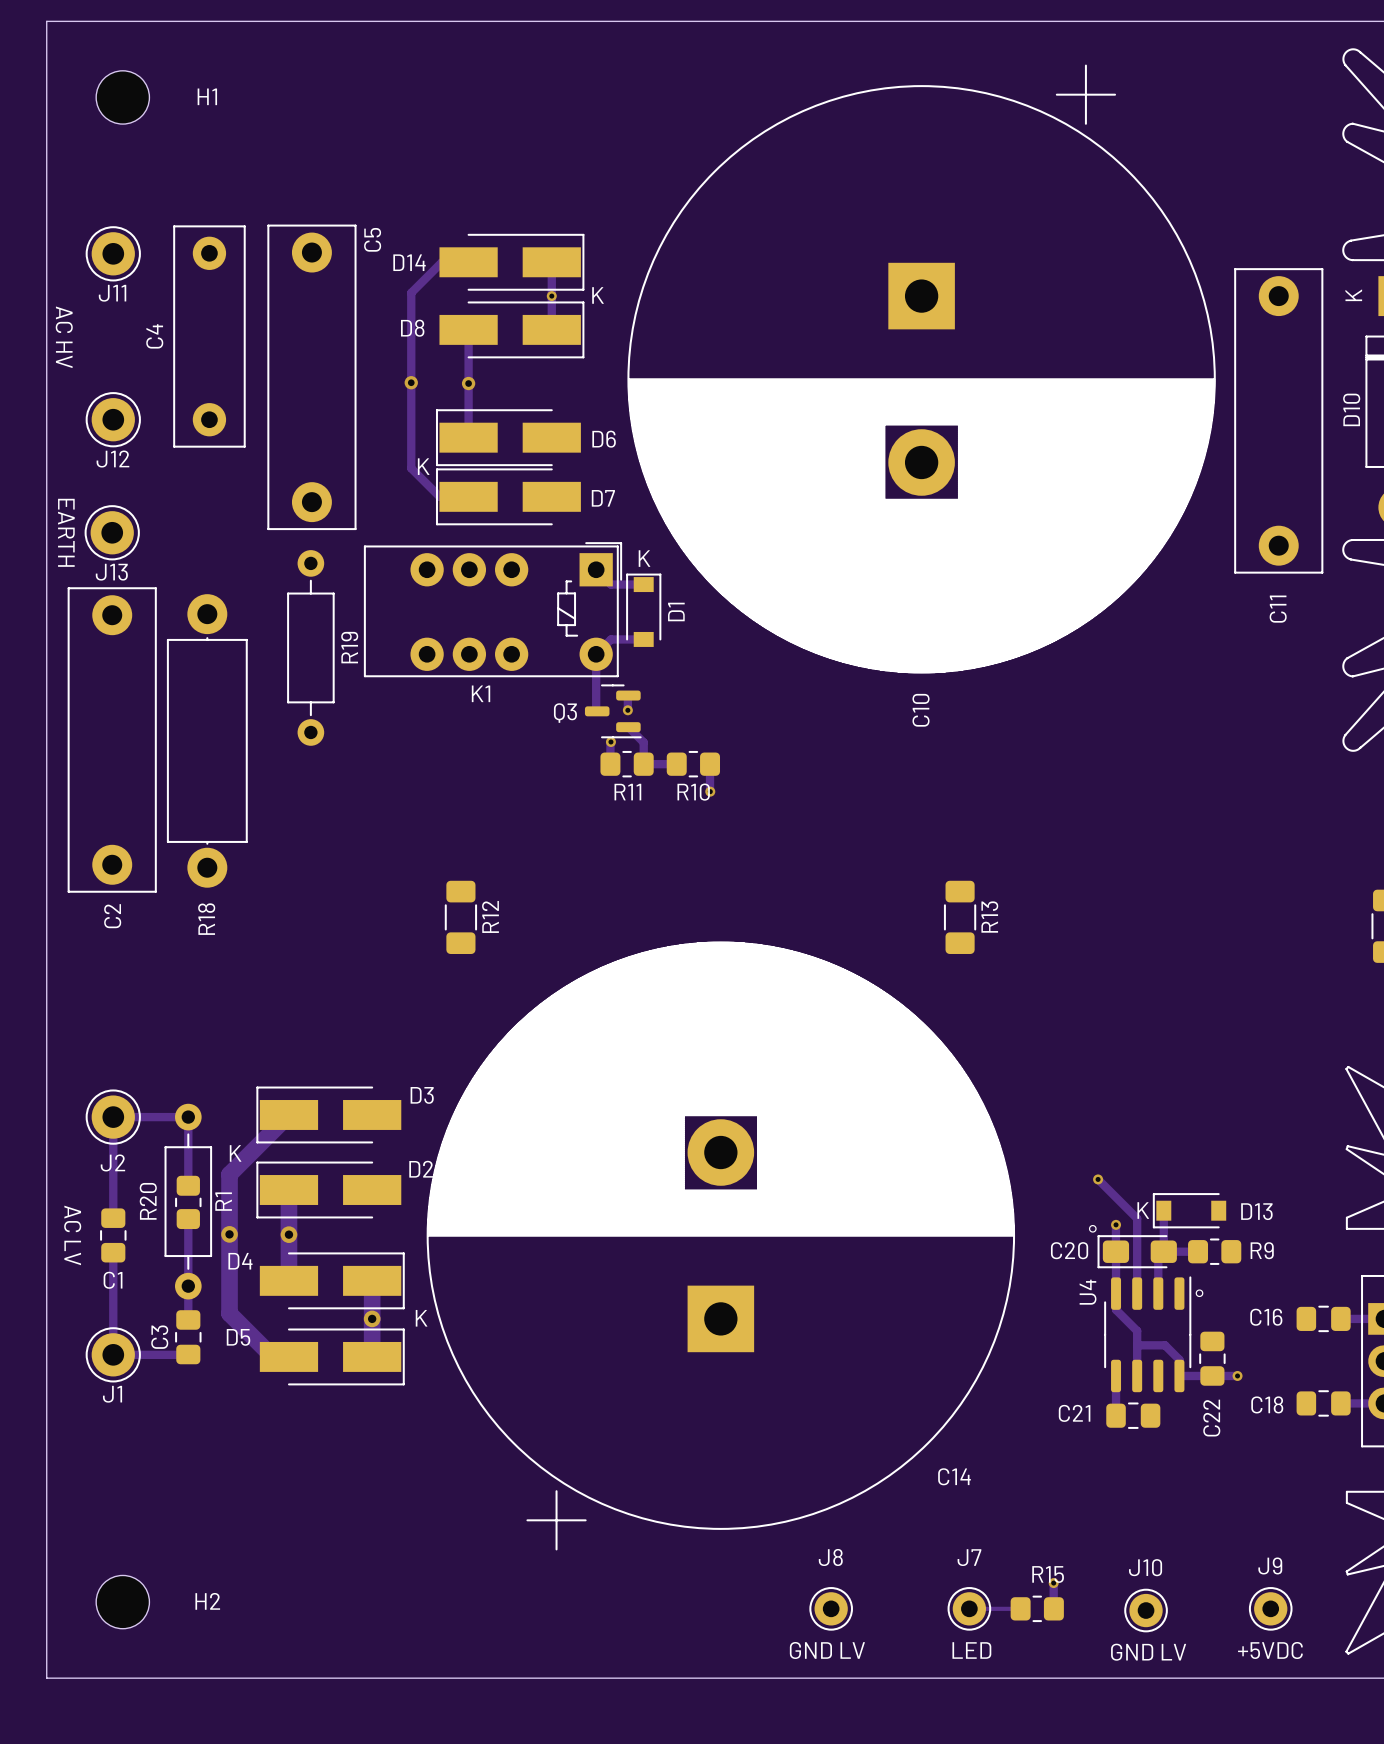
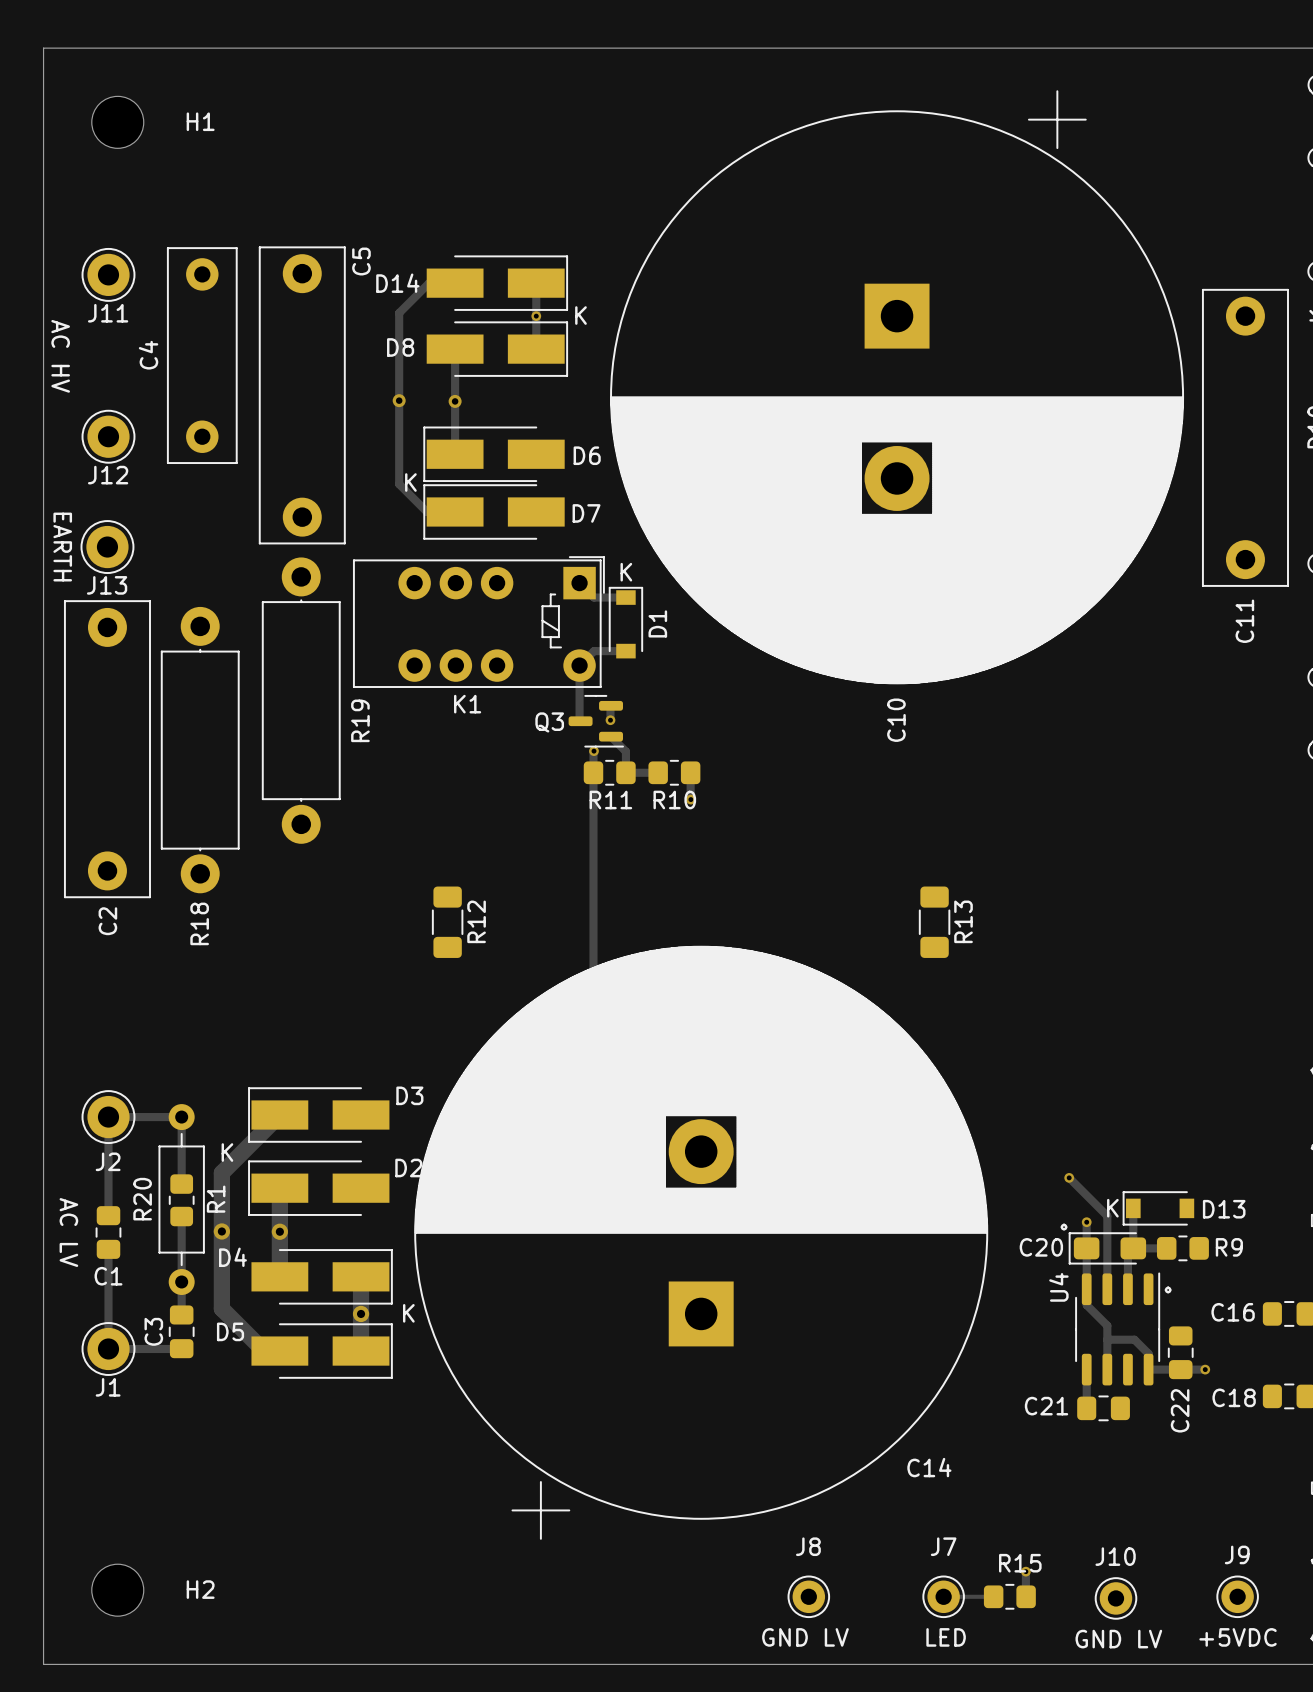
R19 footprint: [287, 550, 335, 746] -> [261, 557, 341, 844]
track: none -> (593, 772) (593, 984)

